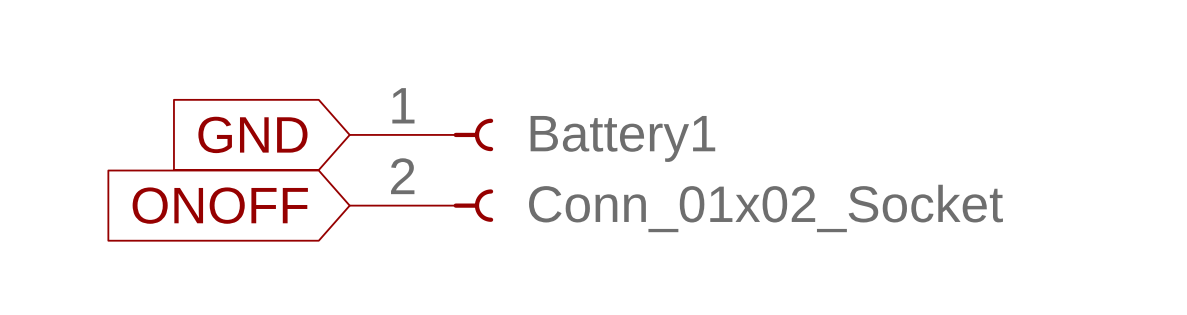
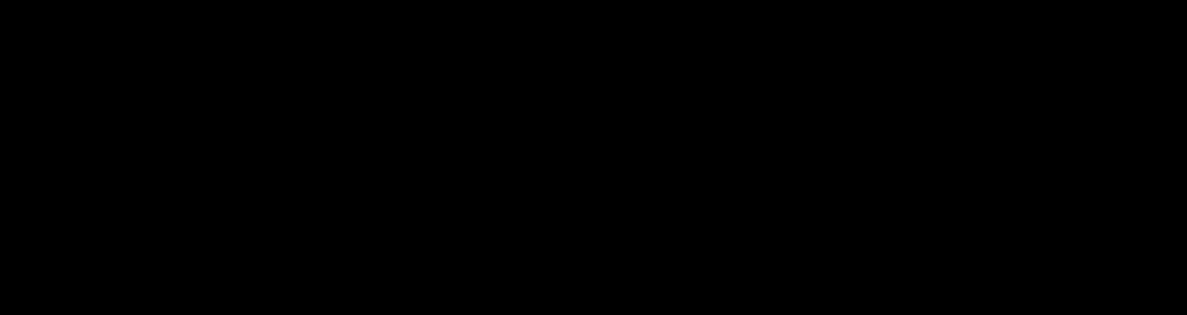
global label: GND (252, 134) -> none
Battery1: Conn_01x02_Socket (421, 170) -> none
global label: ONOFF (220, 205) -> none

